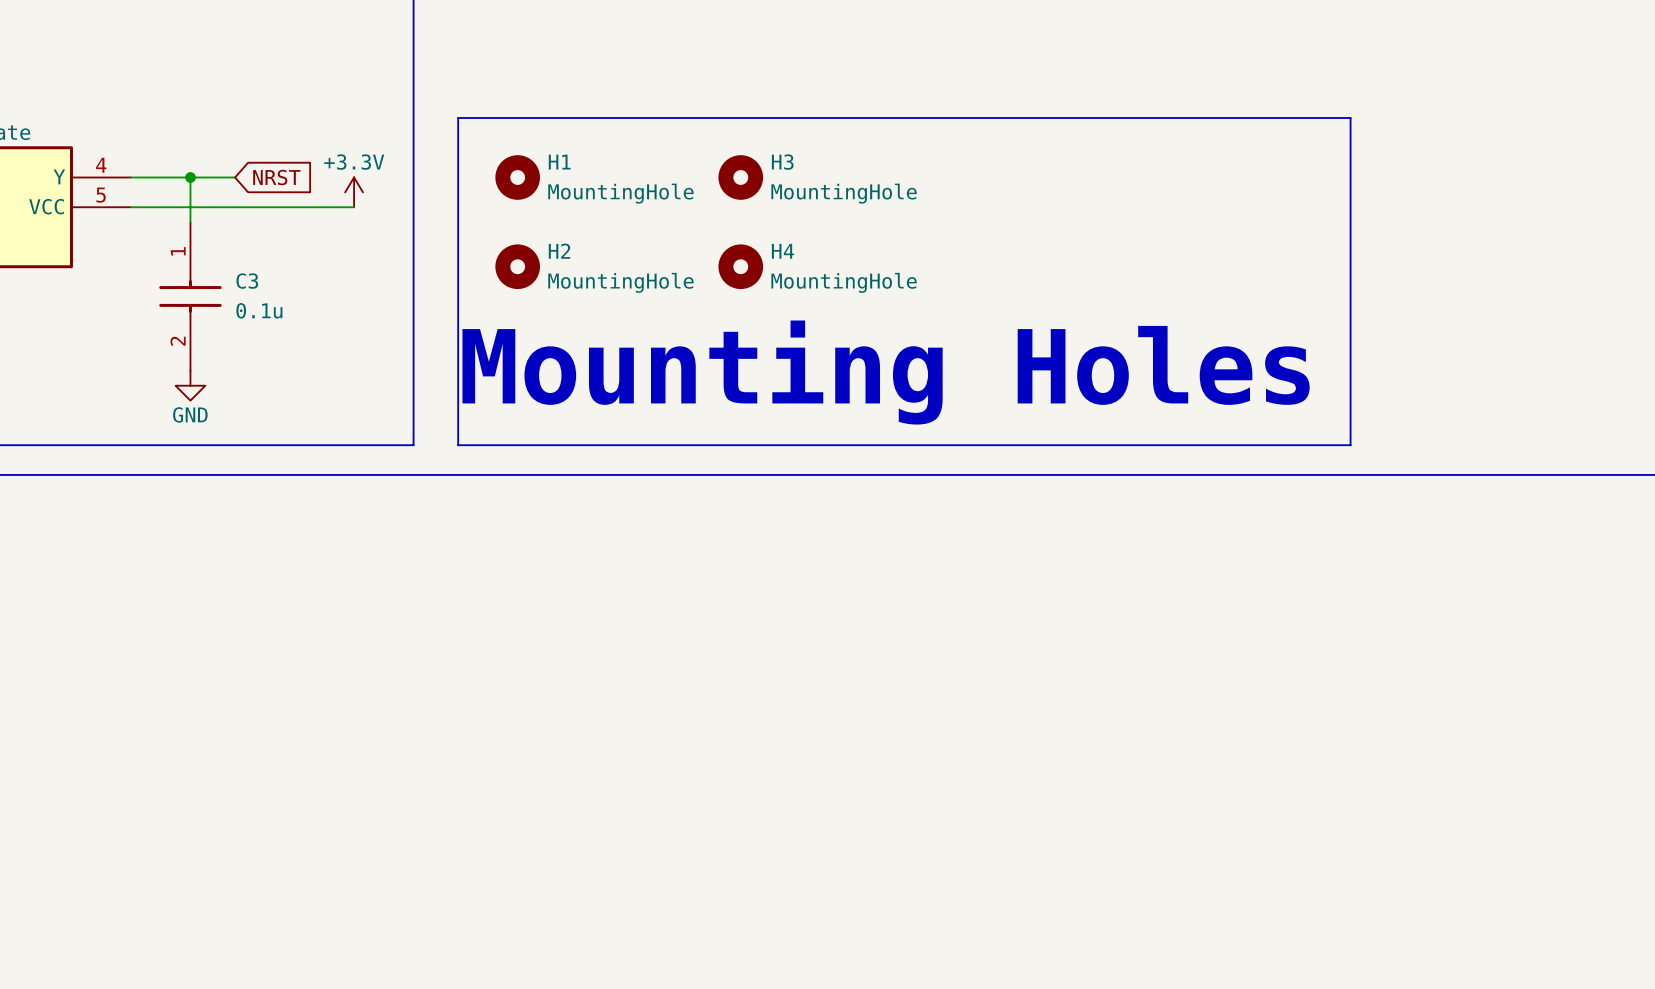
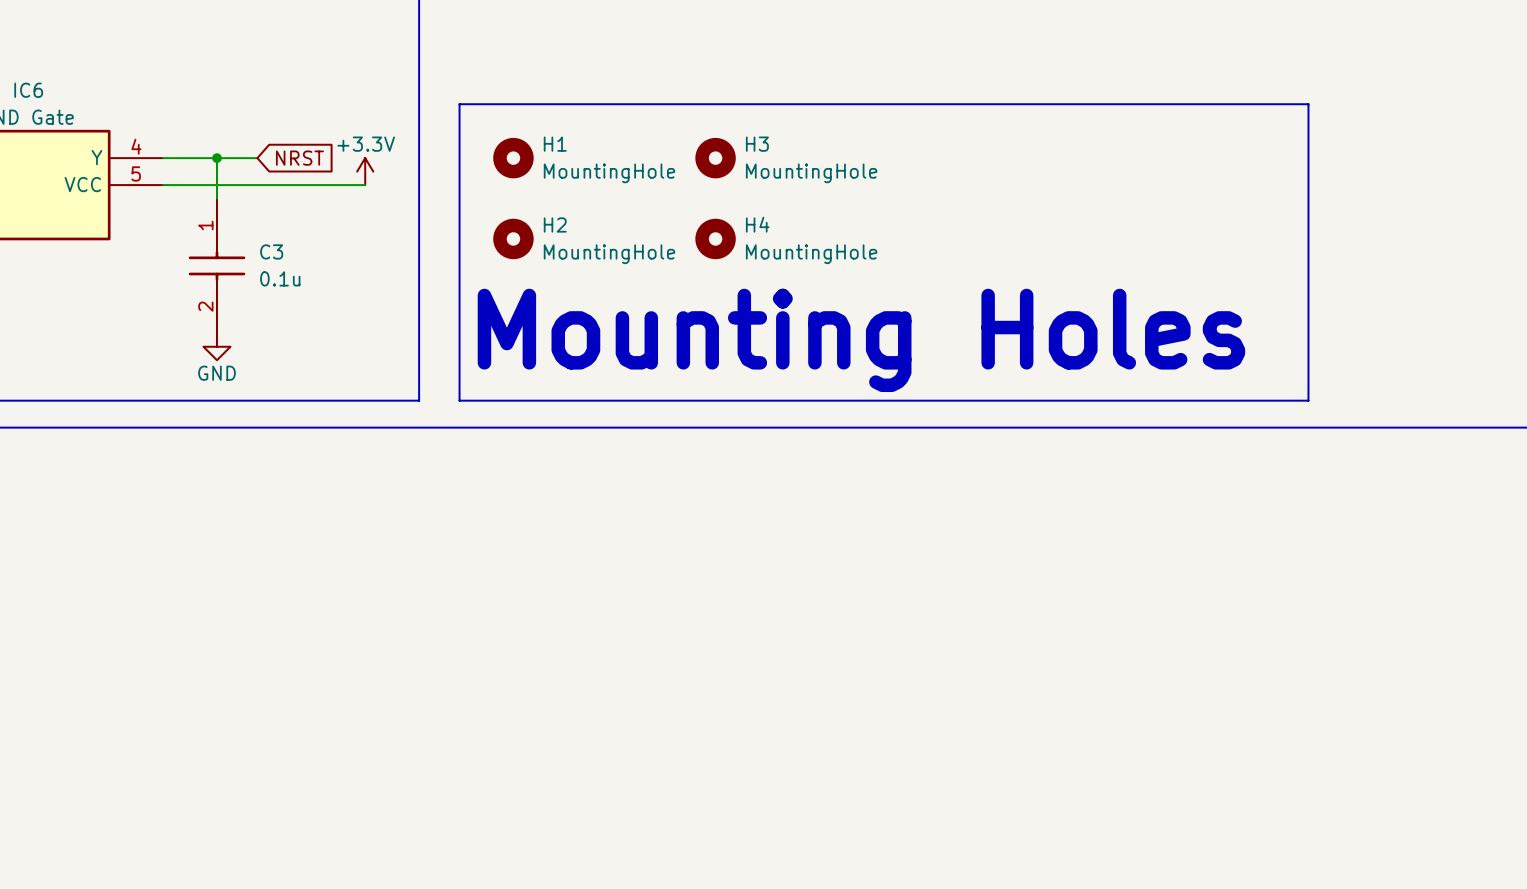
line: (1350, 118) (1350, 445) -> (1268, 104) (1308, 104) (1308, 400) (1268, 400)

